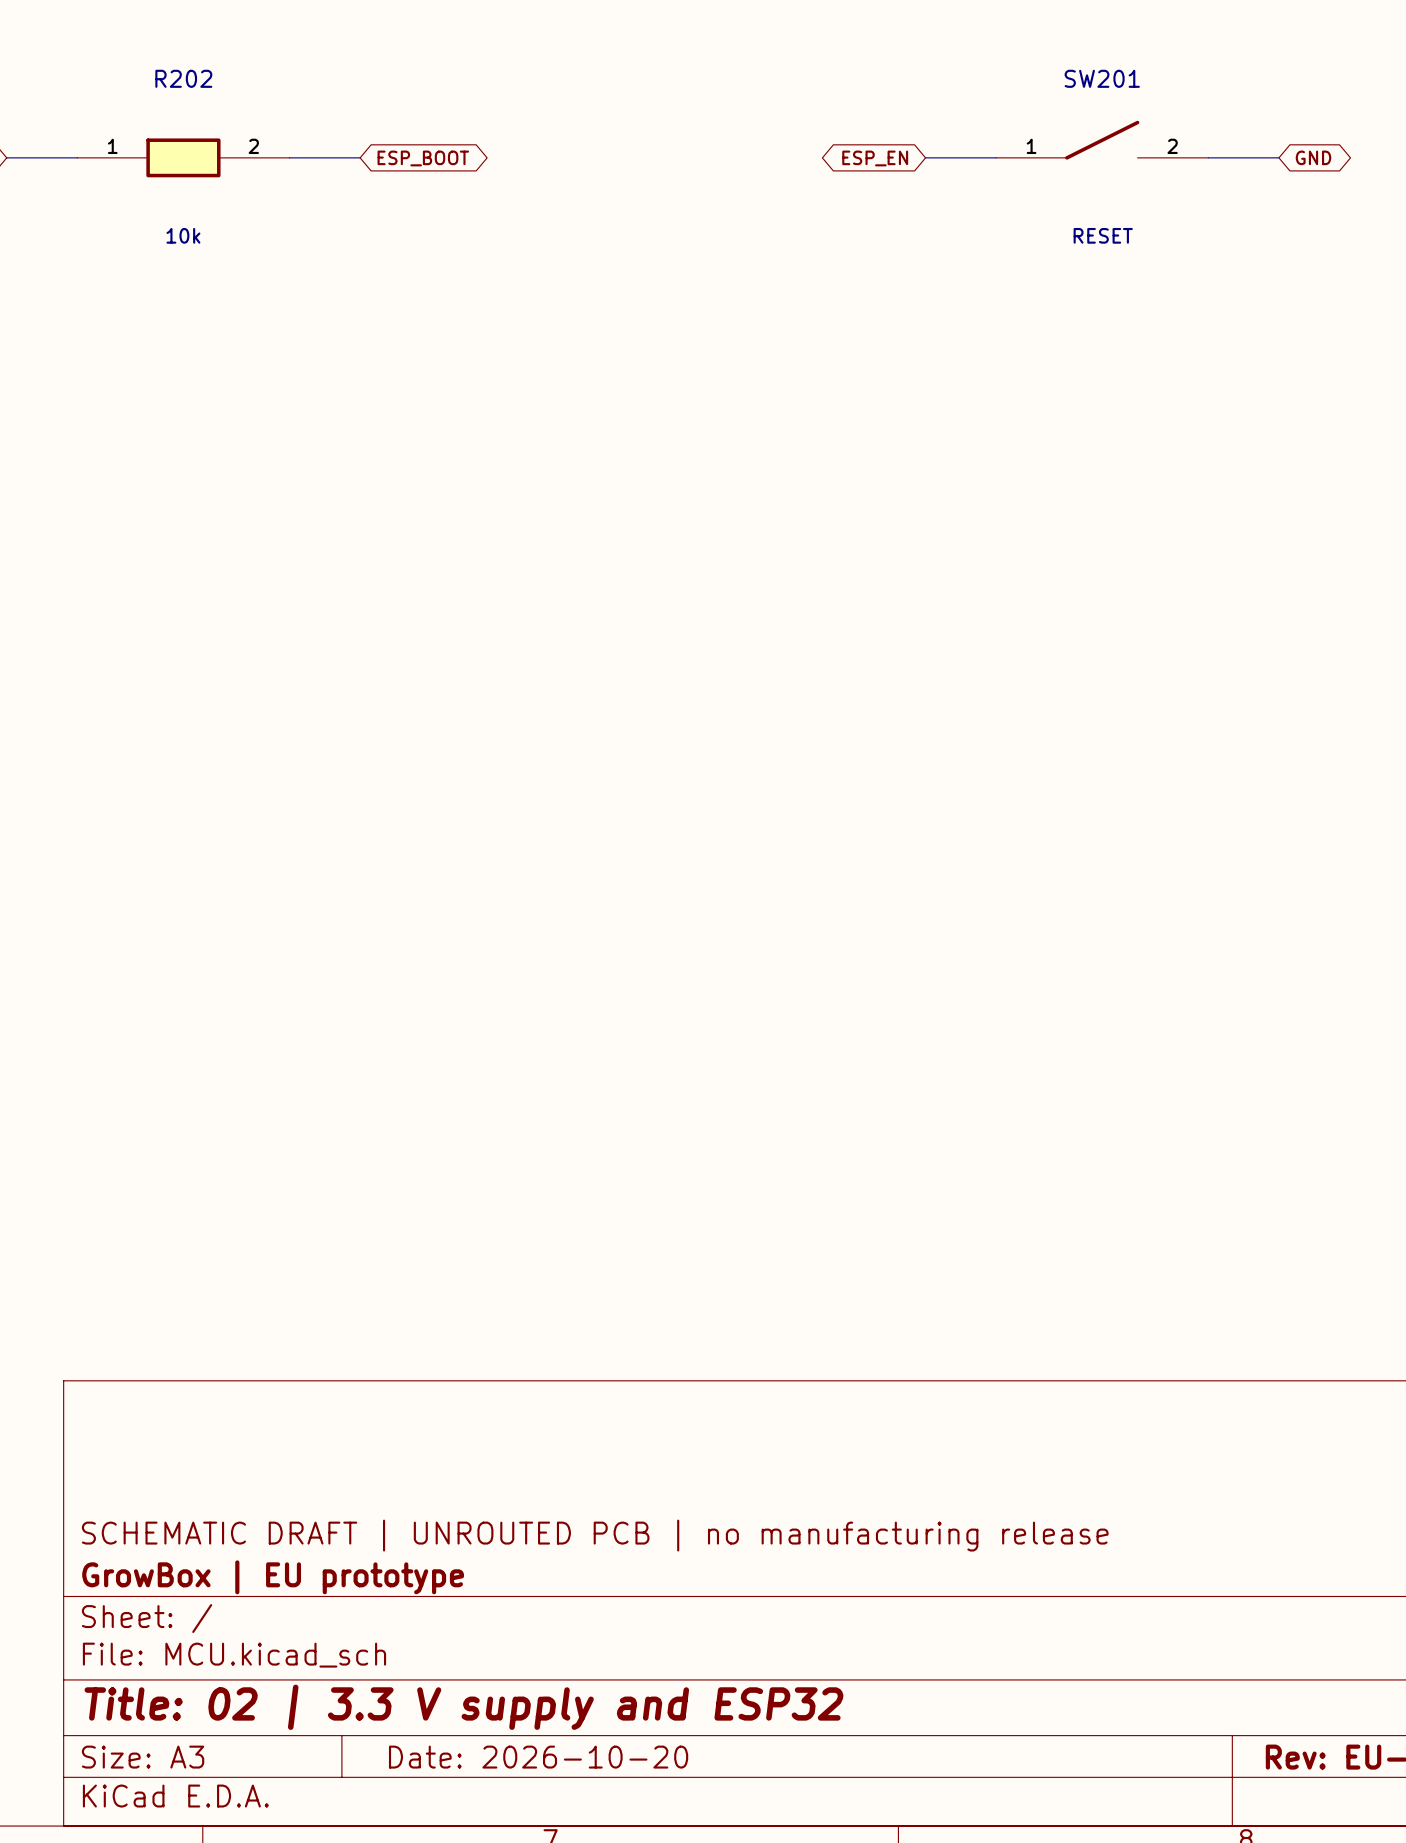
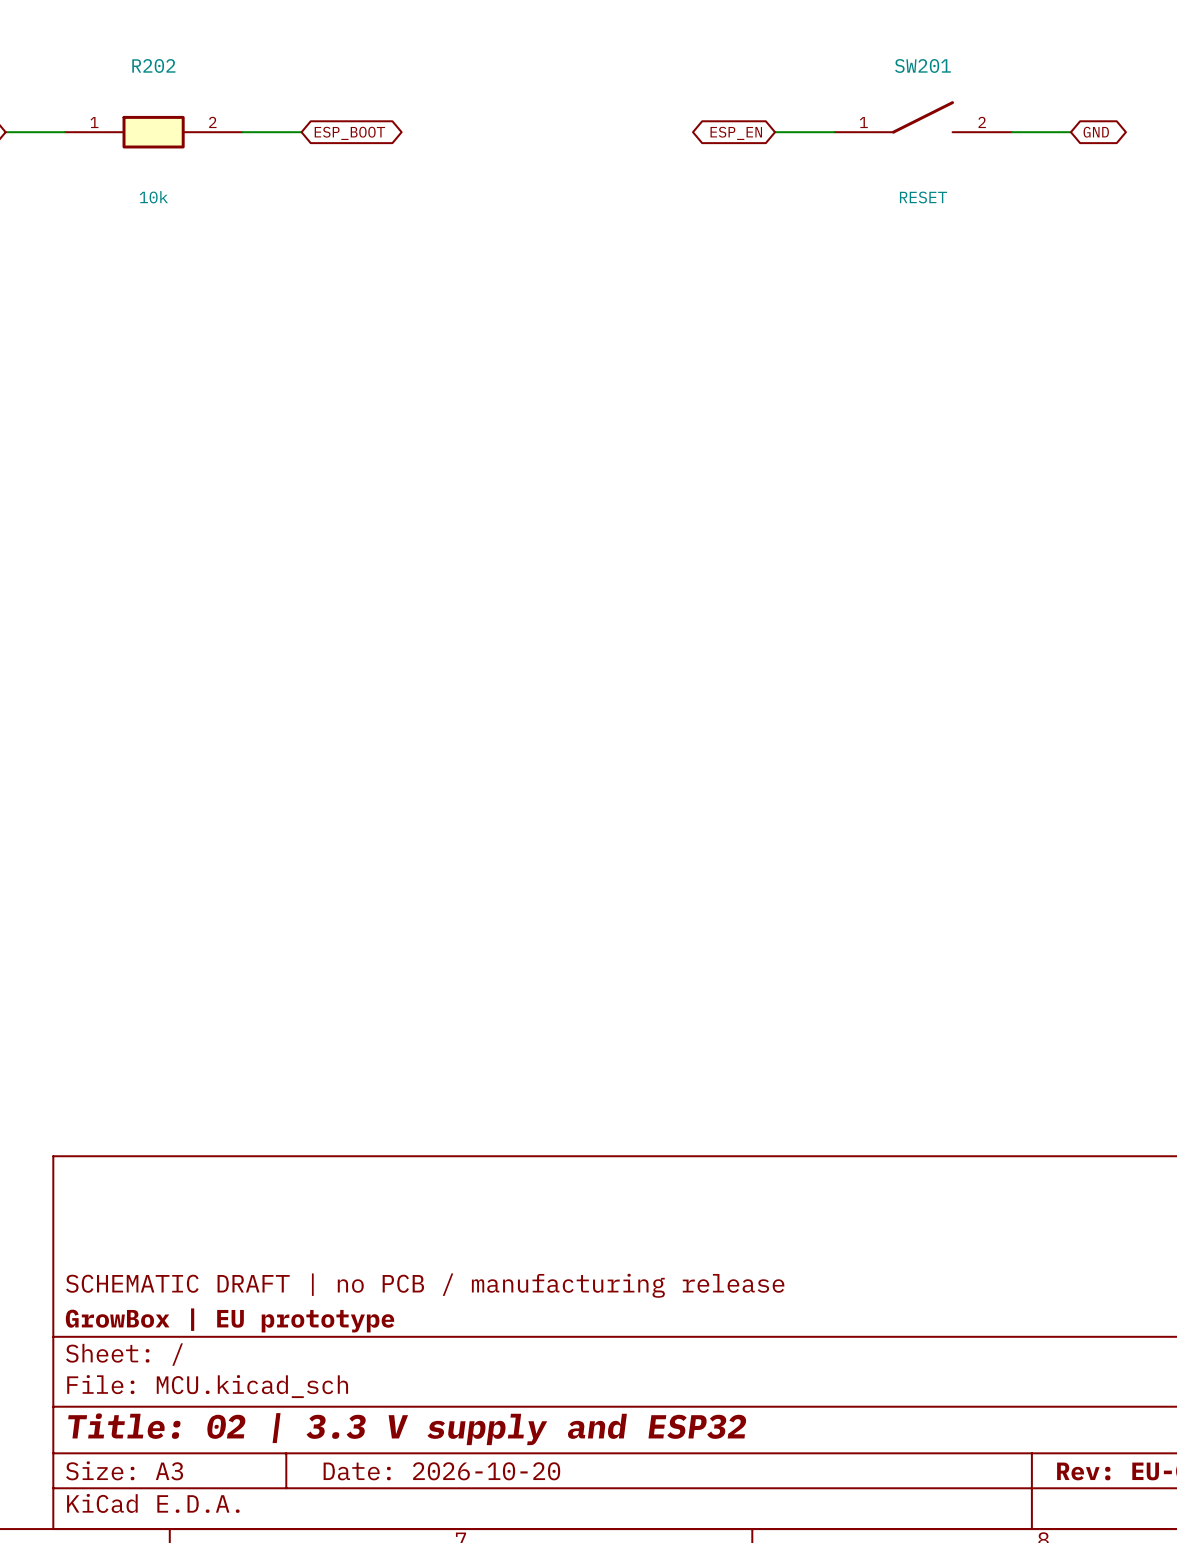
title block: SCHEMATIC DRAFT | UNROUTED PCB | no manufacturing release (595, 1535) -> SCHEMATIC DRAFT | no PCB / manufacturing release (425, 1285)

